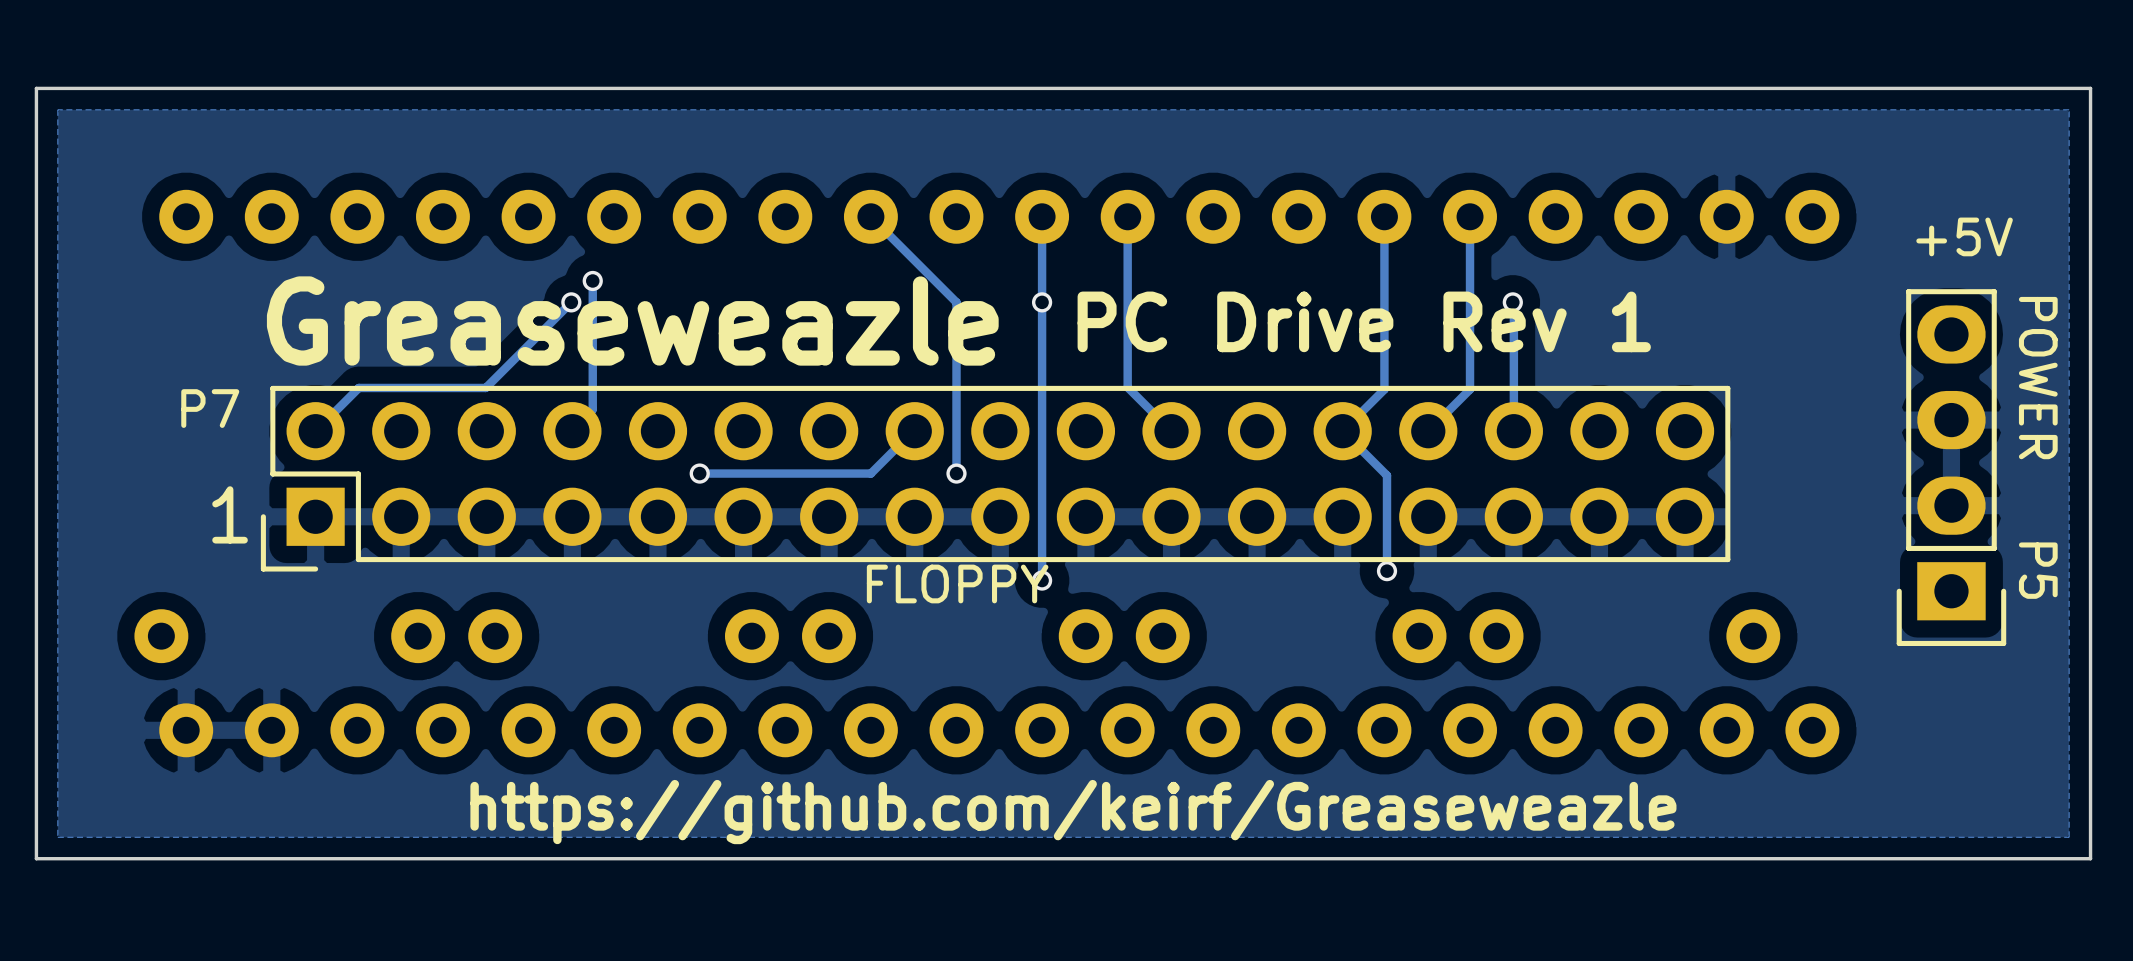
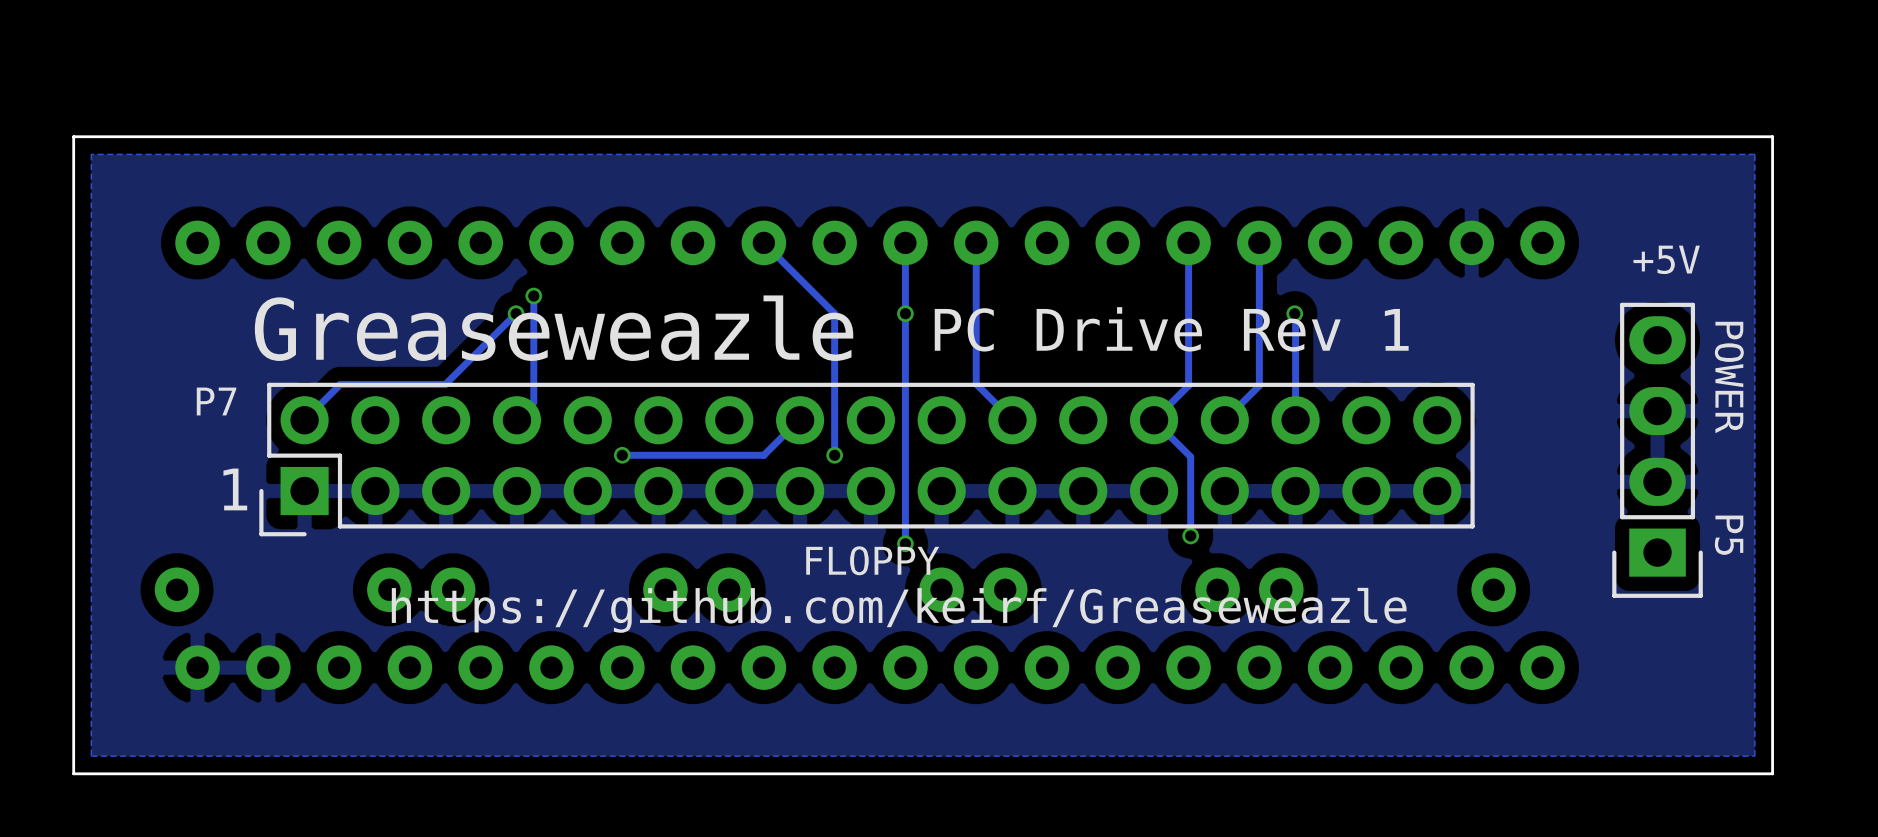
P7 value position: FLOPPY (957, 583) -> FLOPPY (872, 560)
text position: https://github.com/keirf/Greaseweazle (1073, 812) -> https://github.com/keirf/Greaseweazle (899, 610)

